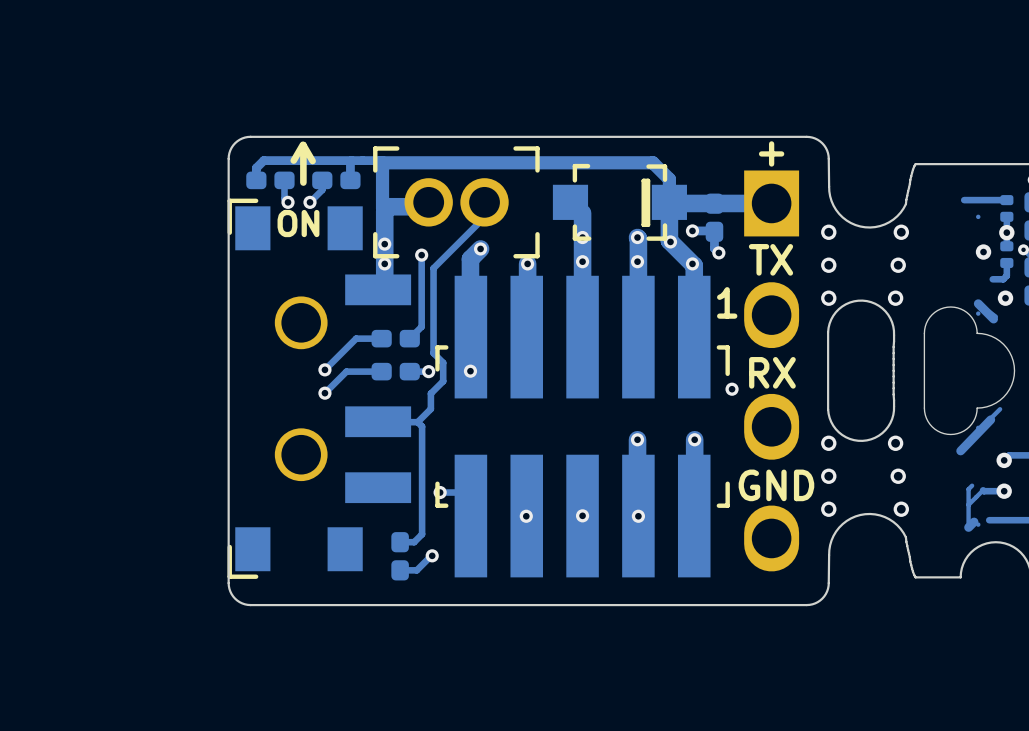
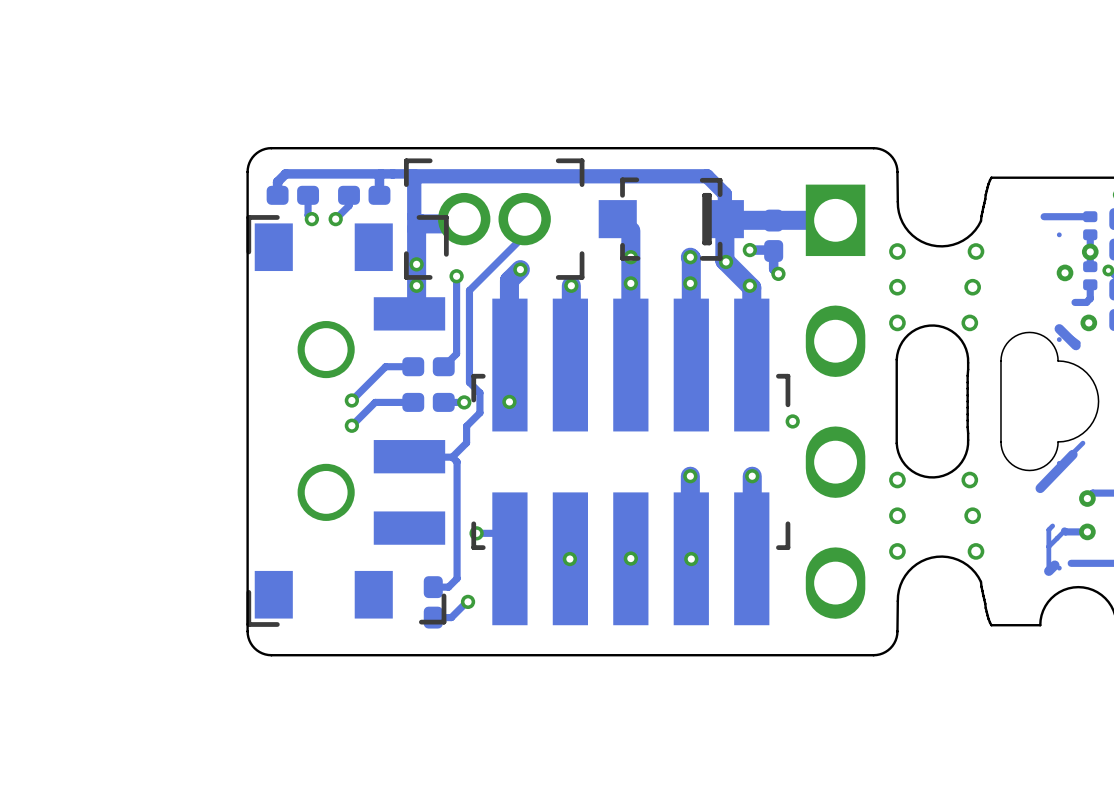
line: (302, 144) (293, 160) -> none
text: + (771, 153) -> none
line: (312, 161) (303, 145) (303, 182) -> none
part footprint: [552, 163, 687, 241] -> [598, 177, 744, 261]
part footprint: [227, 198, 412, 579] -> [246, 215, 449, 627]
text: ON (298, 223) -> none
text: TX (770, 259) -> none
text: 1 (727, 302) -> none
text: RX (772, 372) -> none
text: GND (776, 485) -> none

